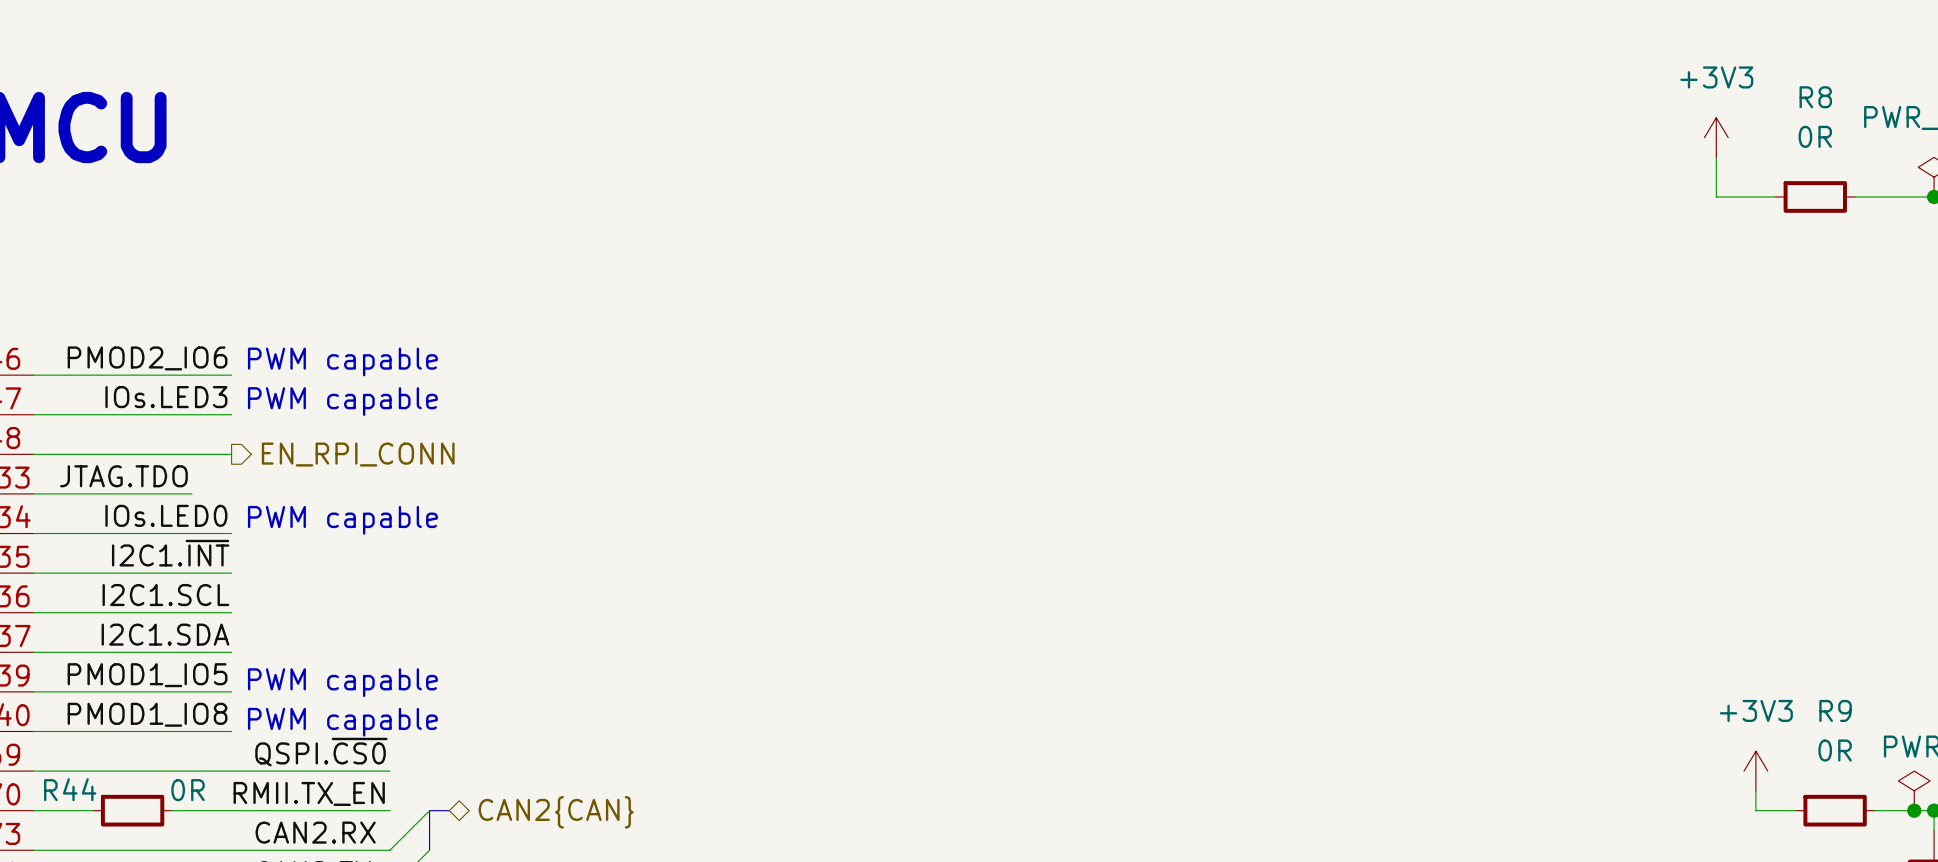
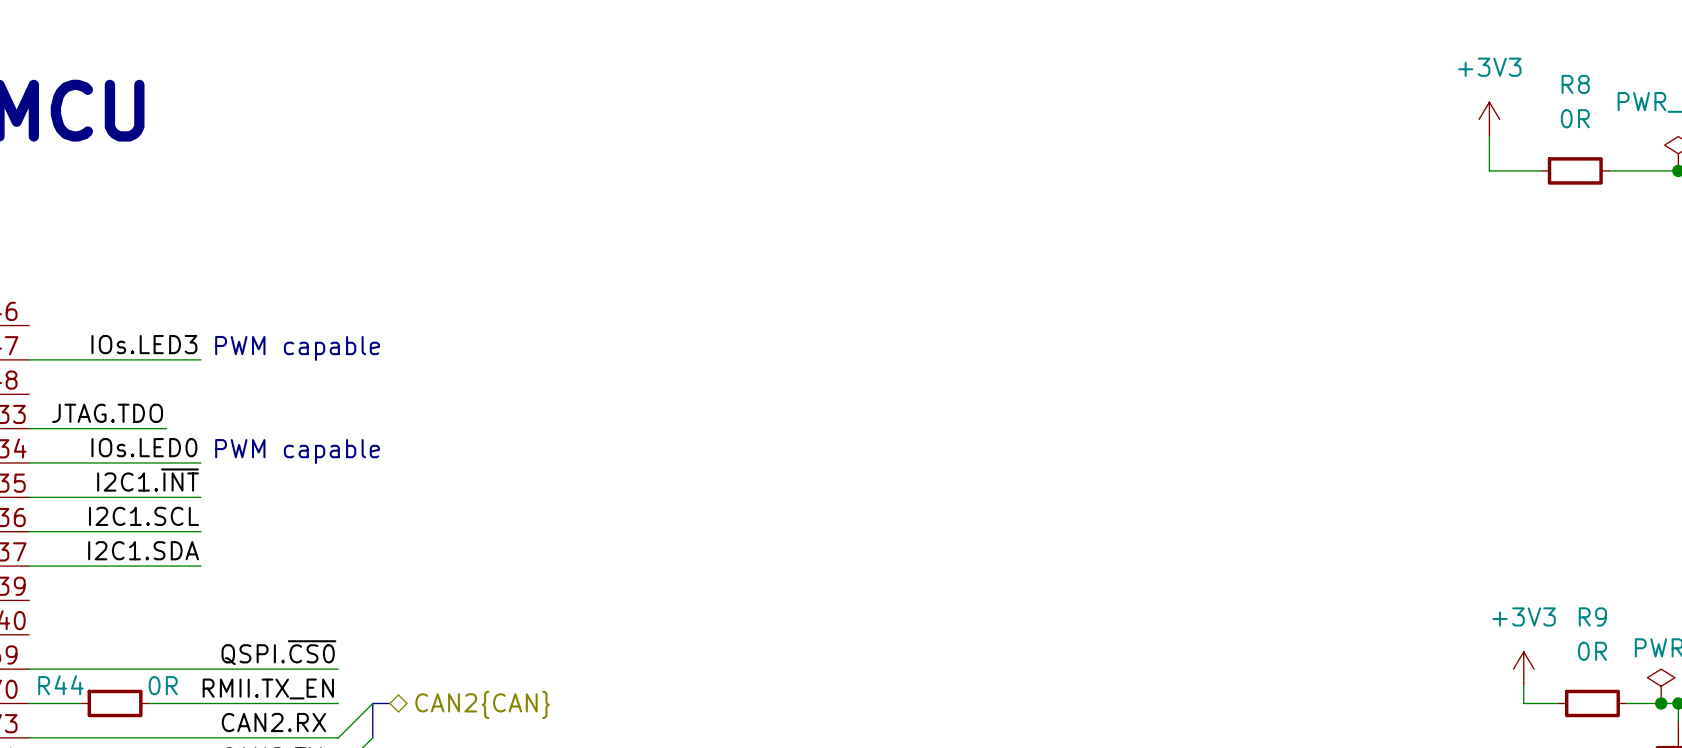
label: PMOD2_IO6 (147, 358) -> none
text: PWM capable (342, 361) -> none
wire: (33, 375) (231, 375) -> none
wire: (33, 454) (231, 454) -> none
hierarchical label: EN_RPI_CONN (358, 454) -> none
label: PMOD1_IO5 (147, 675) -> none
text: PWM capable (342, 682) -> none
wire: (33, 691) (231, 691) -> none
label: PMOD1_IO8 (147, 714) -> none
text: PWM capable (342, 722) -> none
wire: (33, 731) (231, 731) -> none

